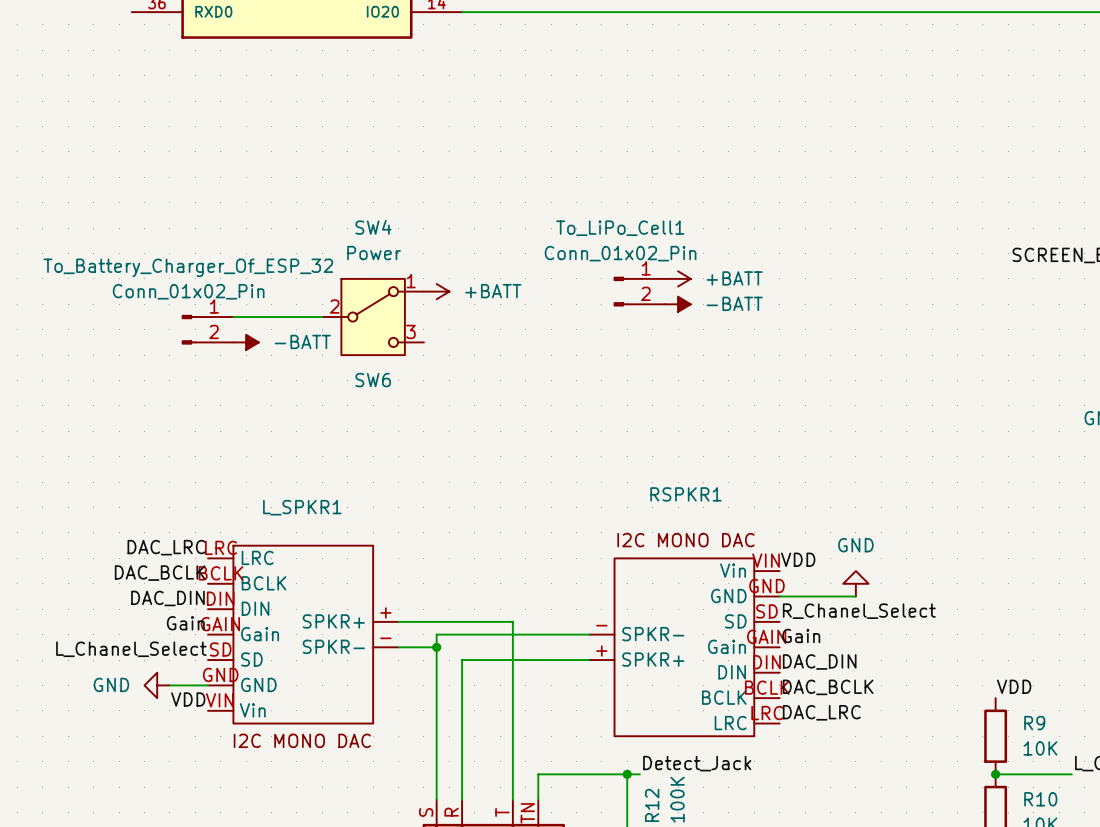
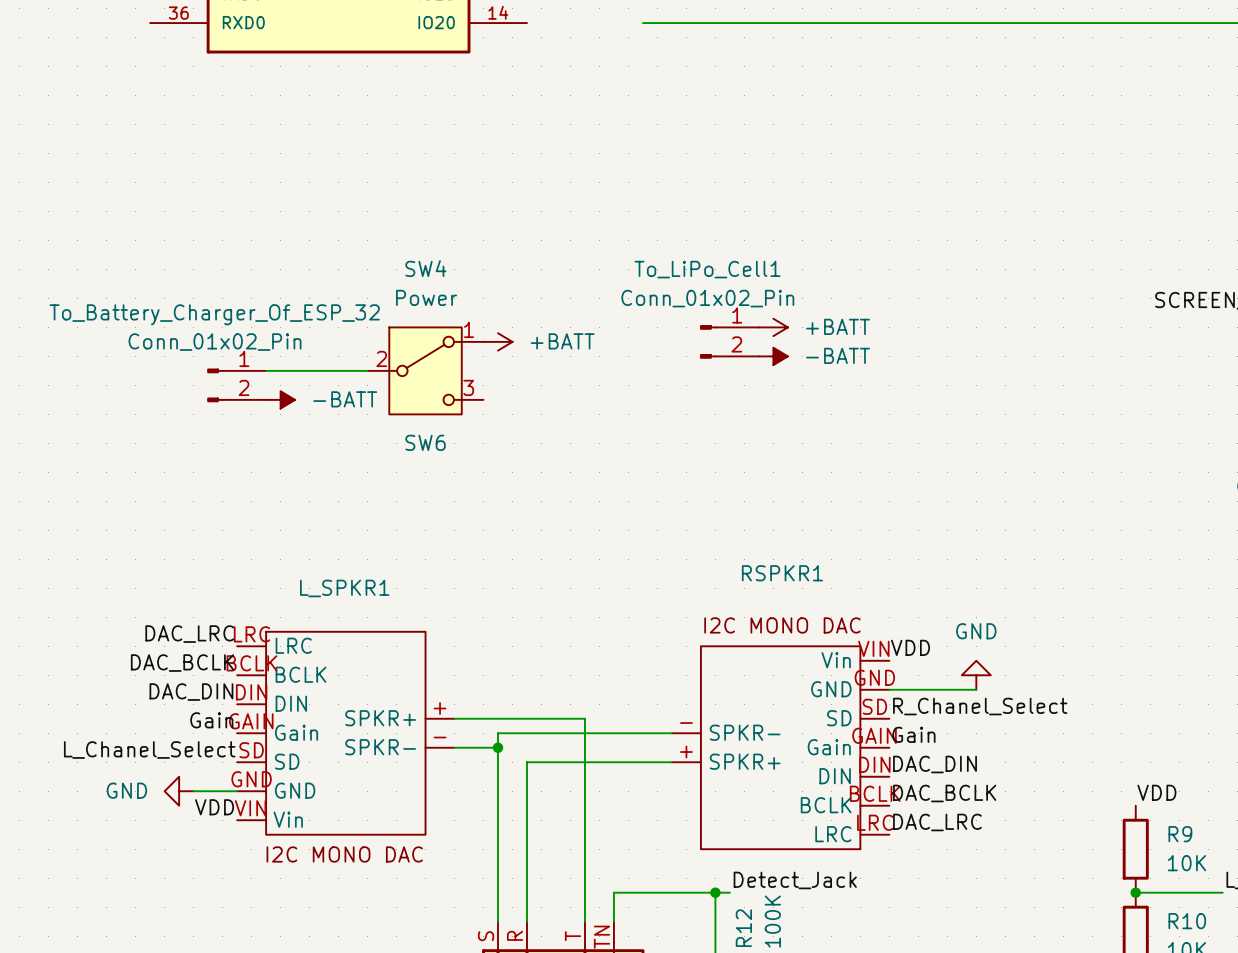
wire: (462, 12) (563, 12) -> none

